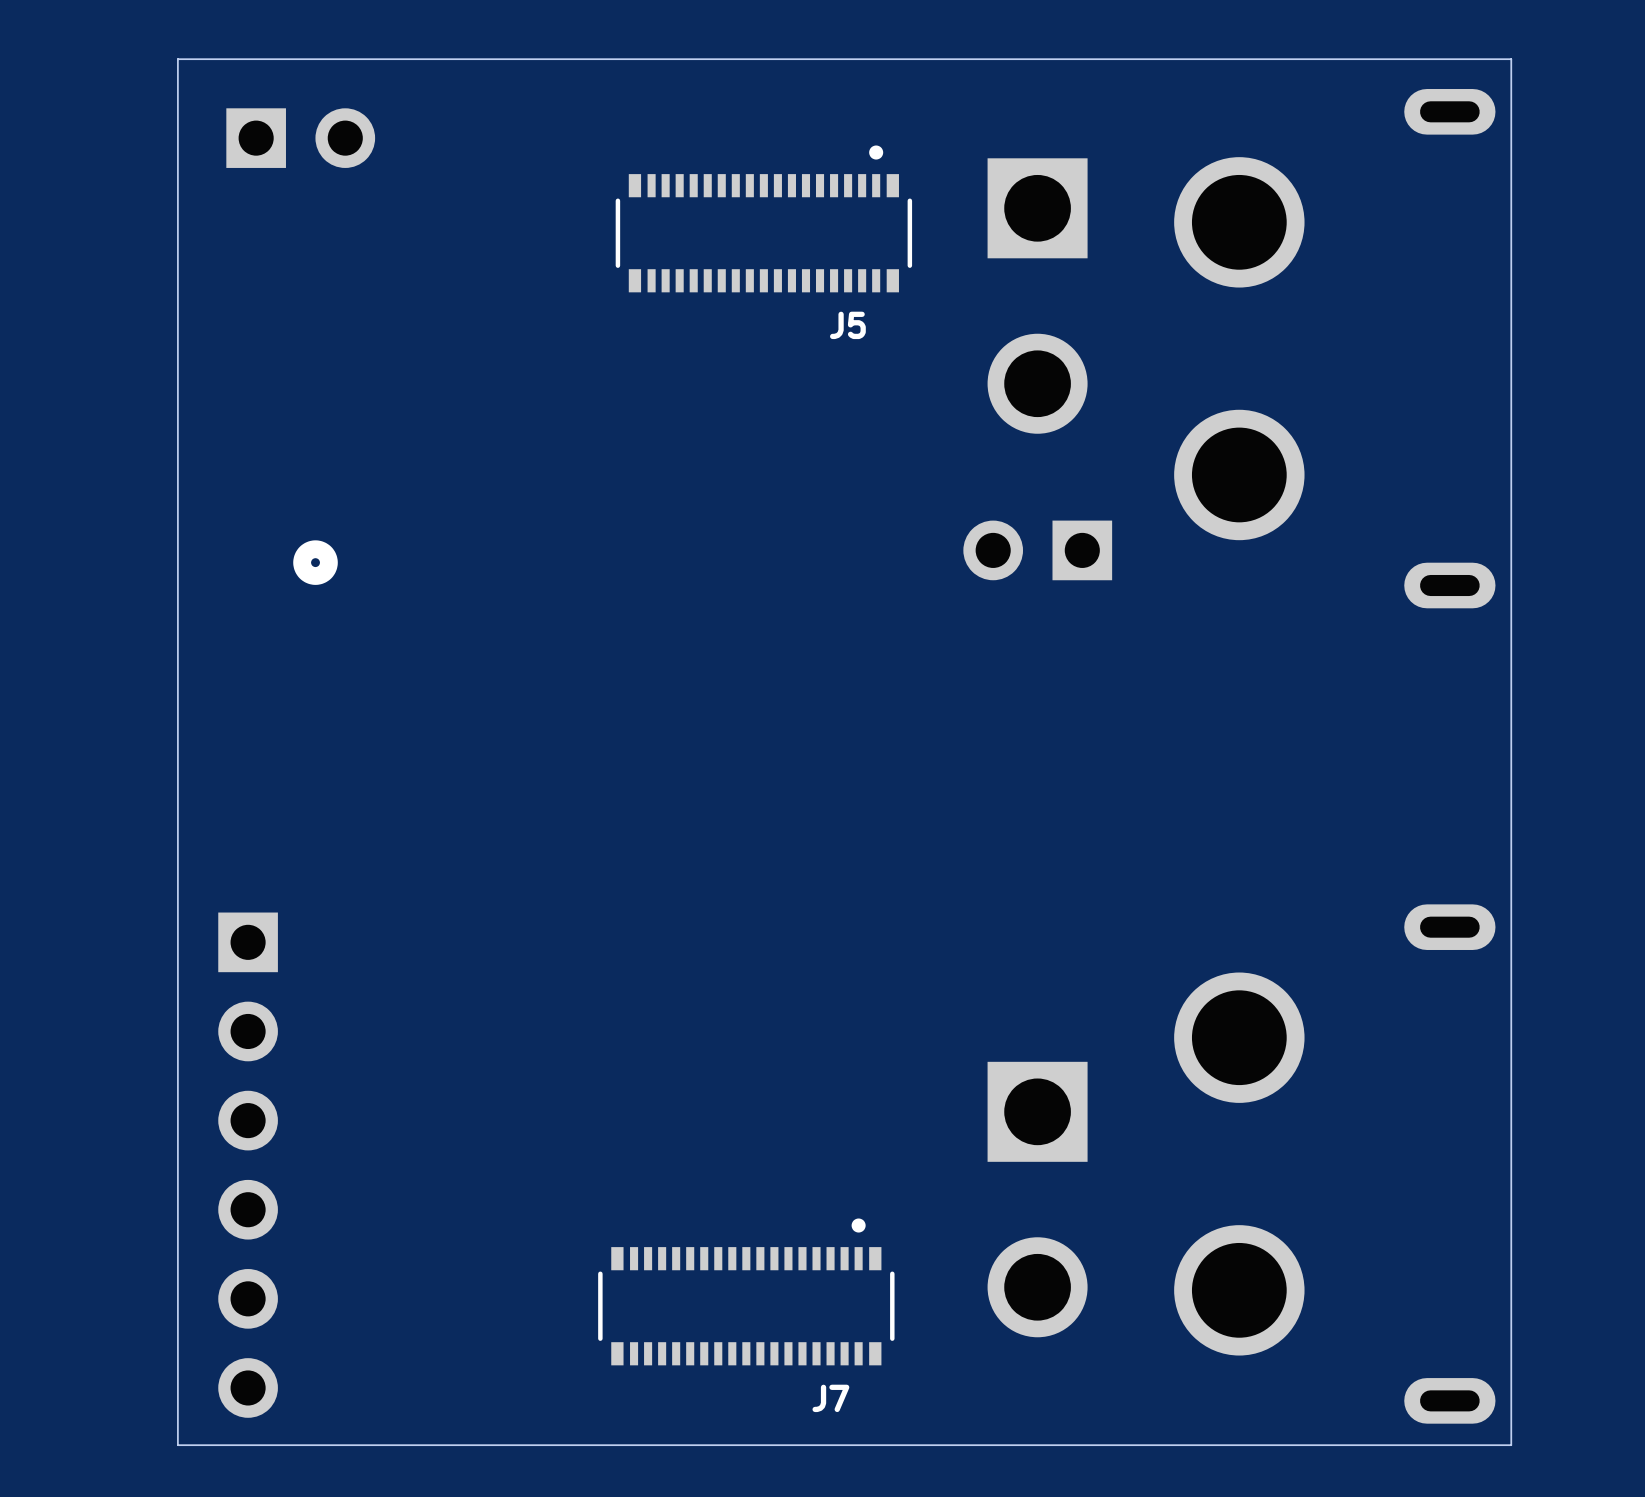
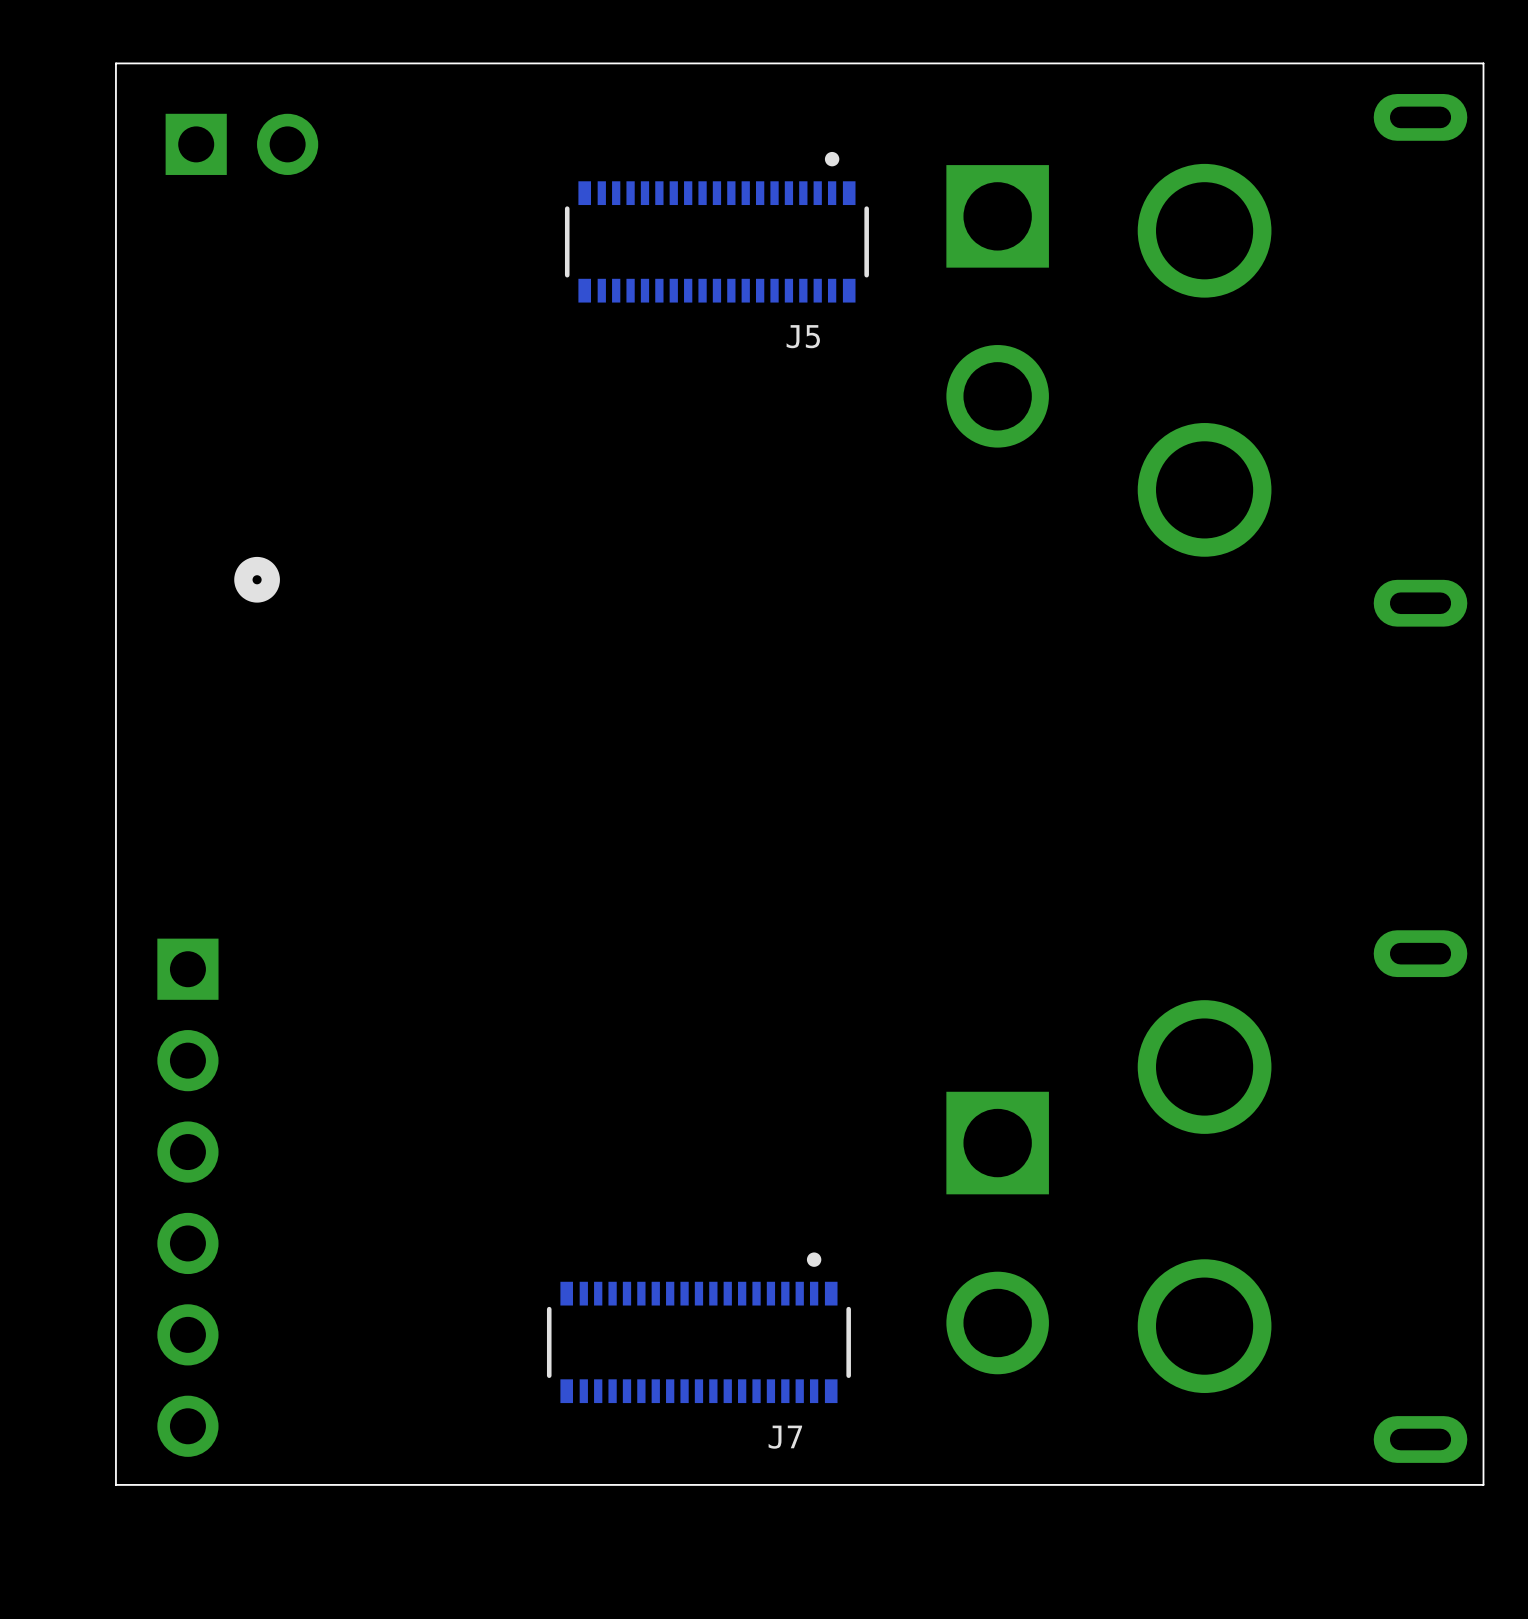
part: (1037, 550) -> none

